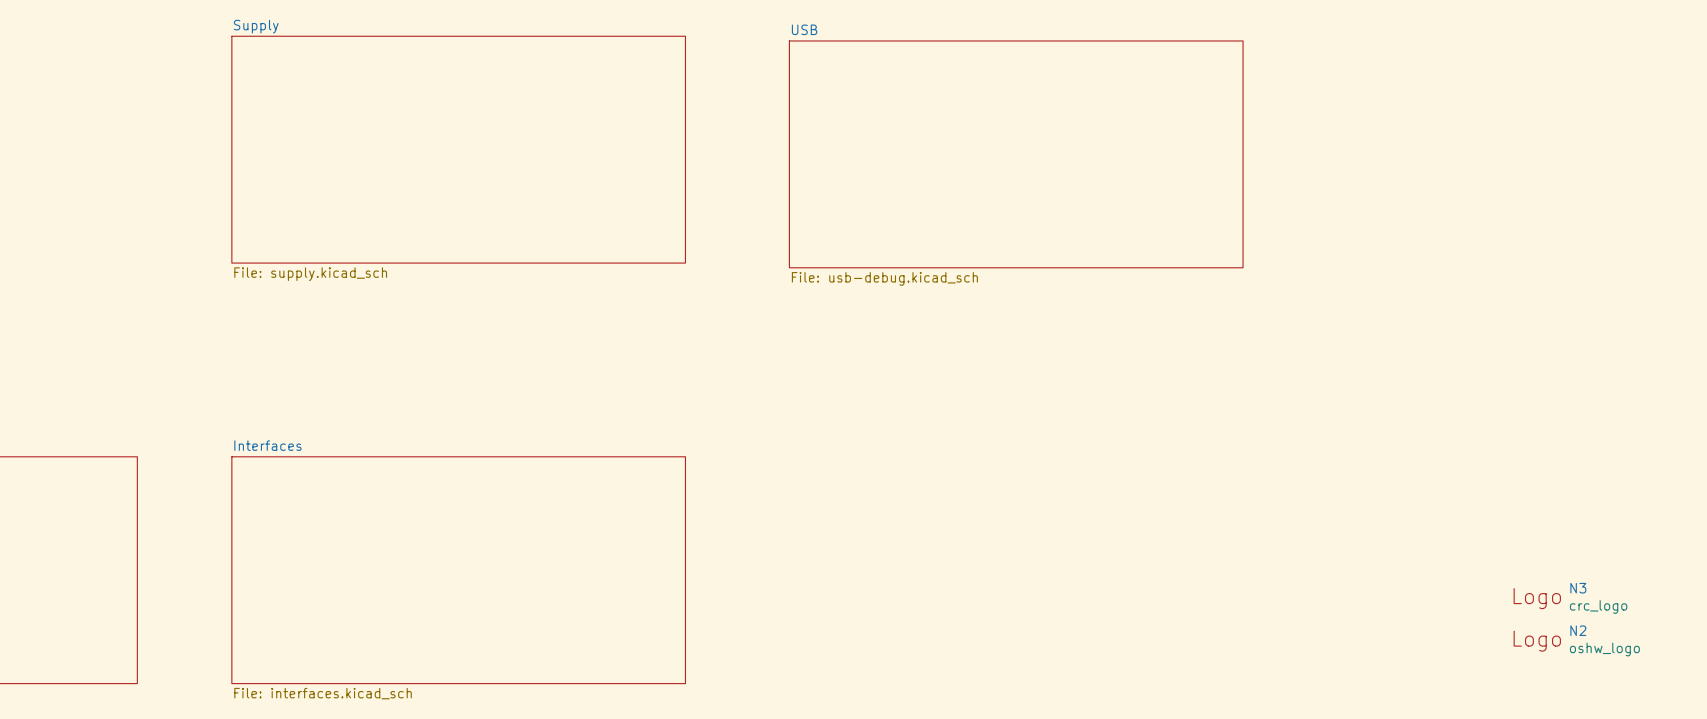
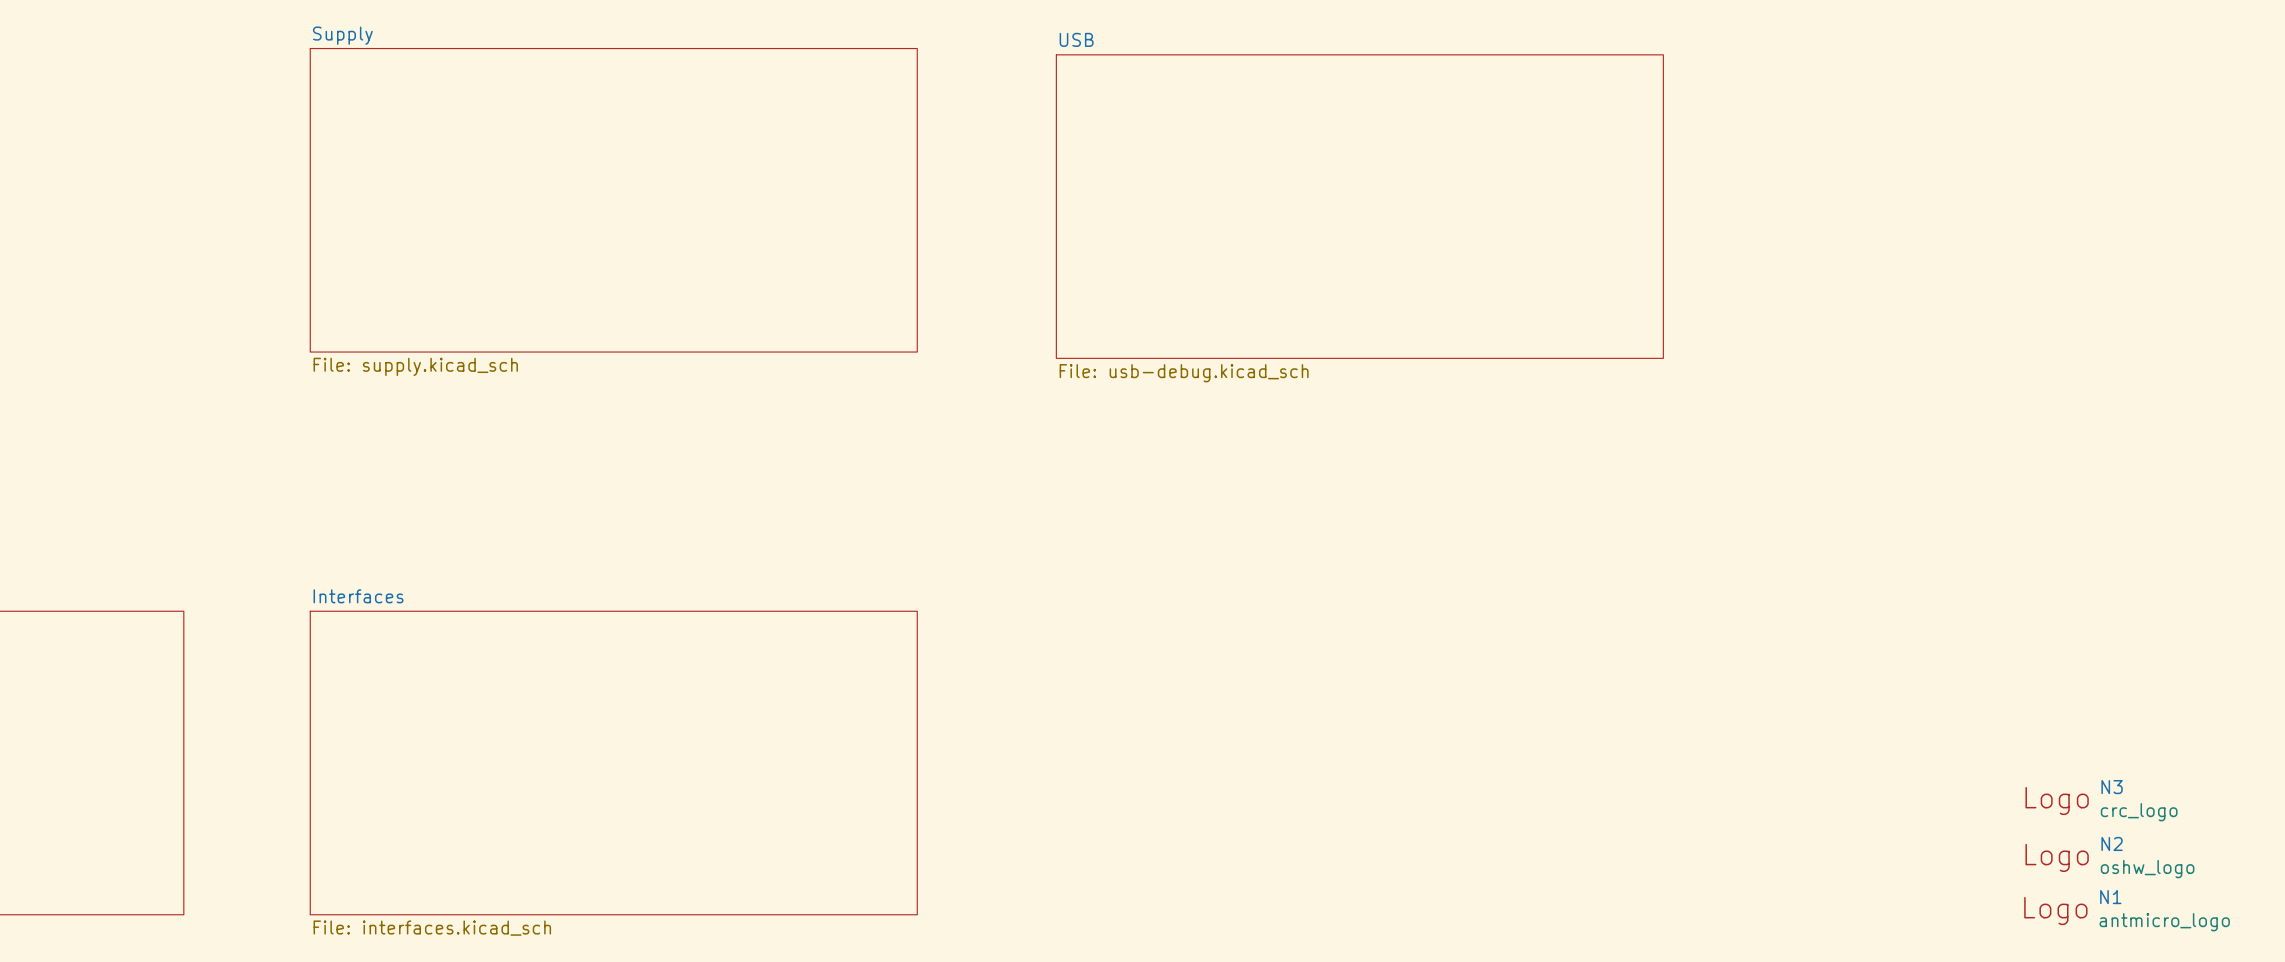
N1: none -> antmicro_logo (2127, 910)

